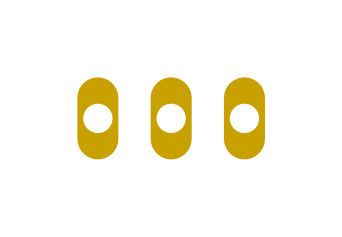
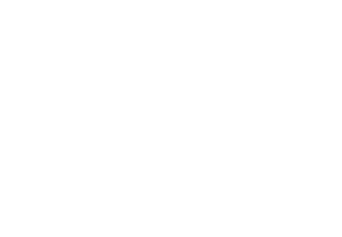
part: (171, 118) -> none

